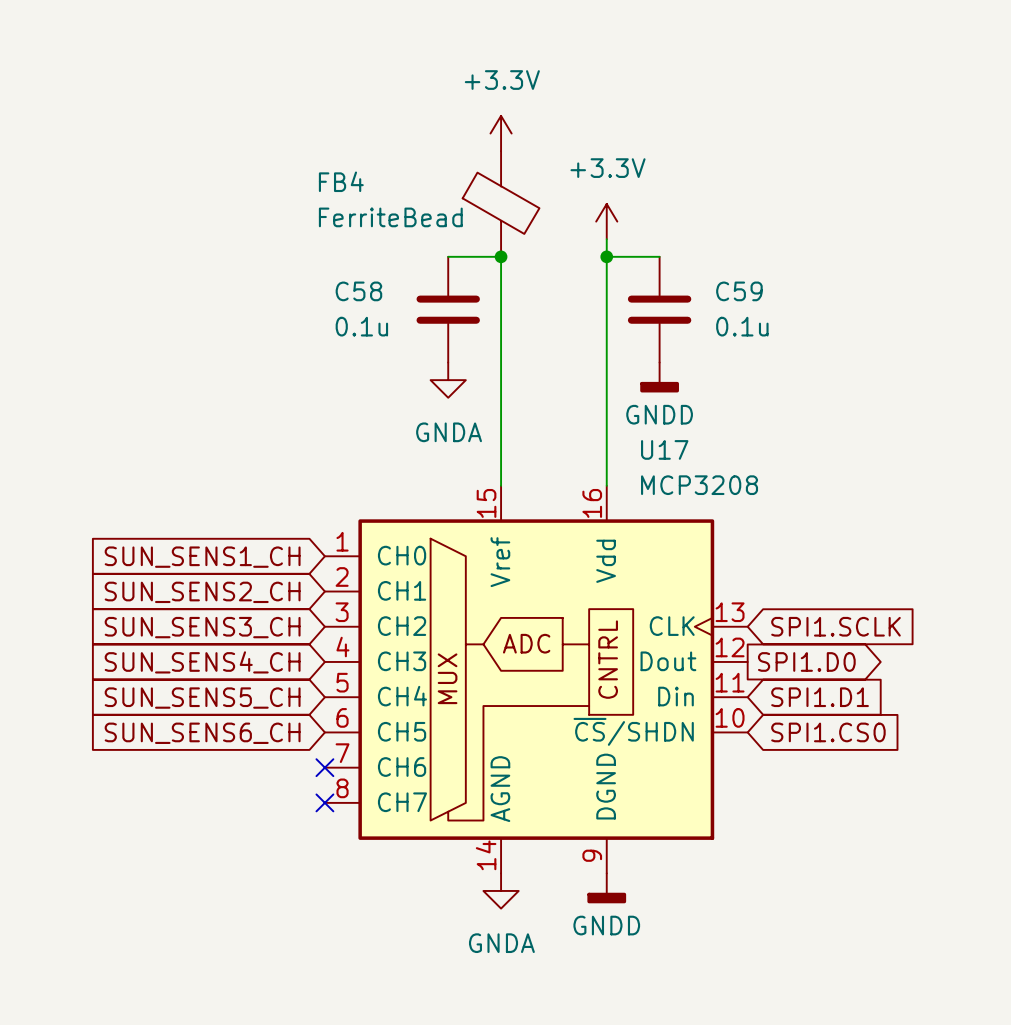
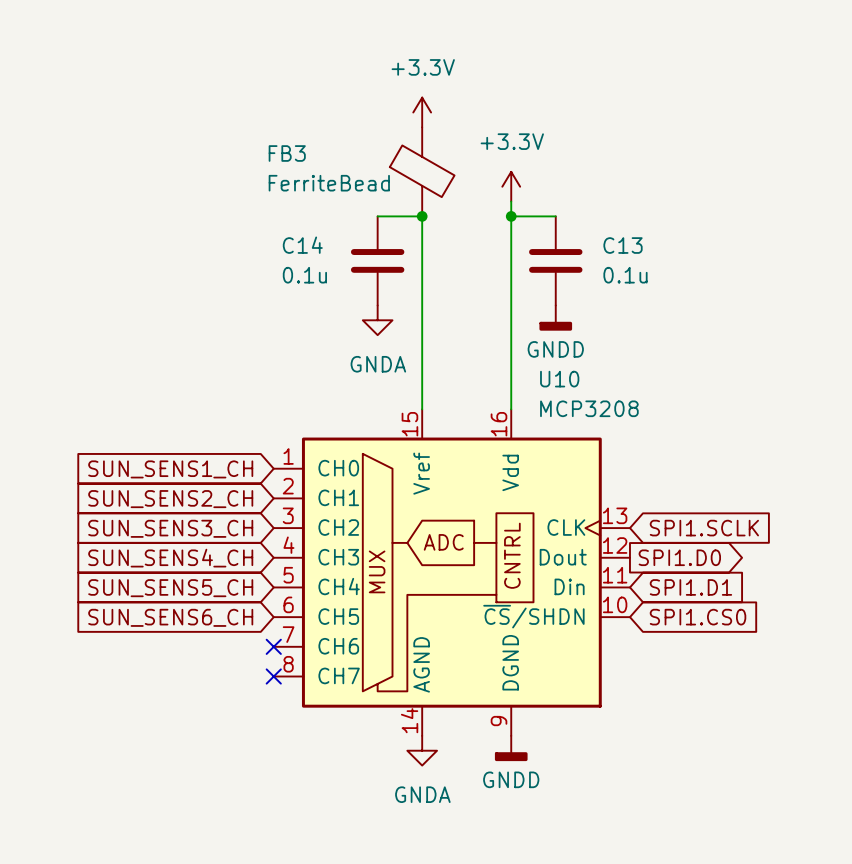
FB4 name: FB4 (341, 181) -> FB3 (287, 153)
C58 name: C58 (358, 291) -> C14 (302, 245)
C59 name: C59 (739, 291) -> C13 (623, 245)
U17 name: U17 (664, 449) -> U10 (559, 379)

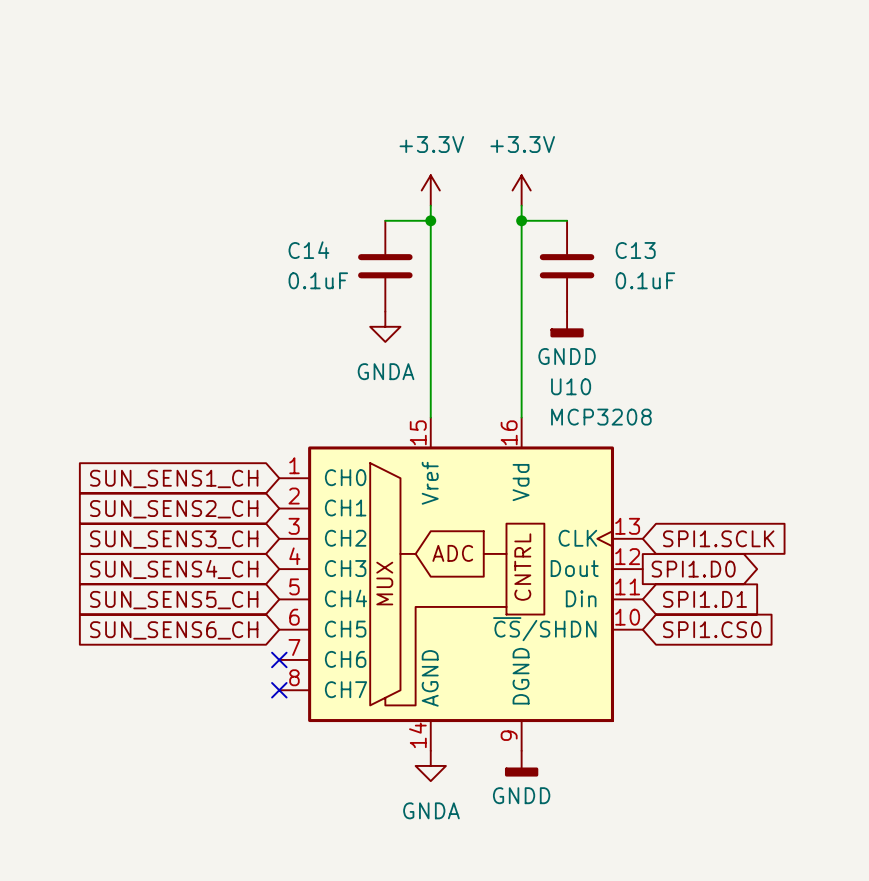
power symbol position: +3.3V (422, 112) -> +3.3V (430, 190)
FB3: FerriteBead (422, 171) -> none
C14 value: 0.1u (304, 275) -> 0.1uF (318, 280)
C13 value: 0.1u (625, 275) -> 0.1uF (645, 280)

